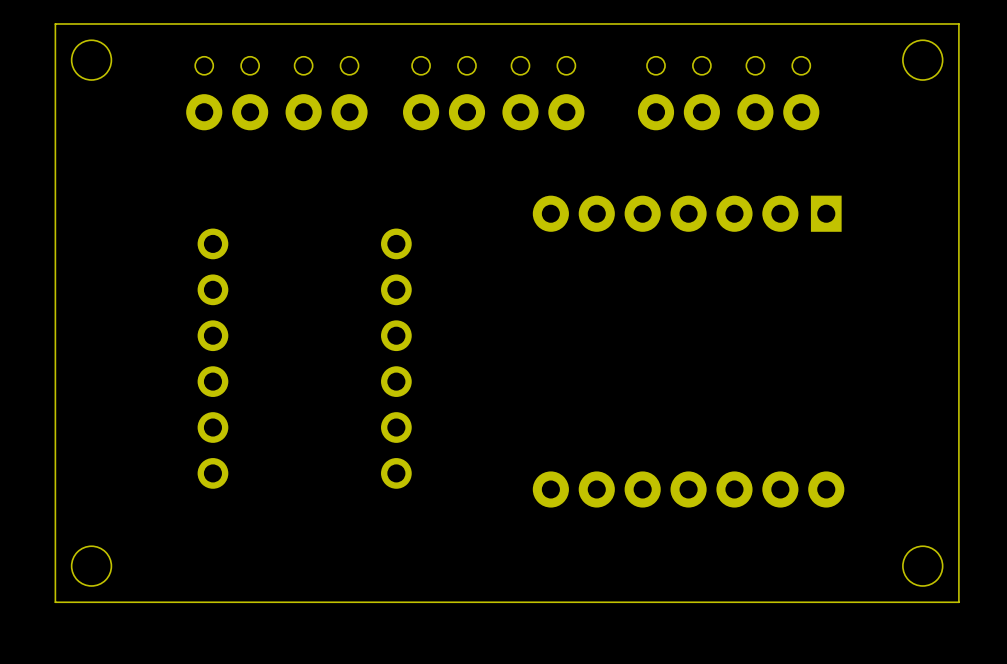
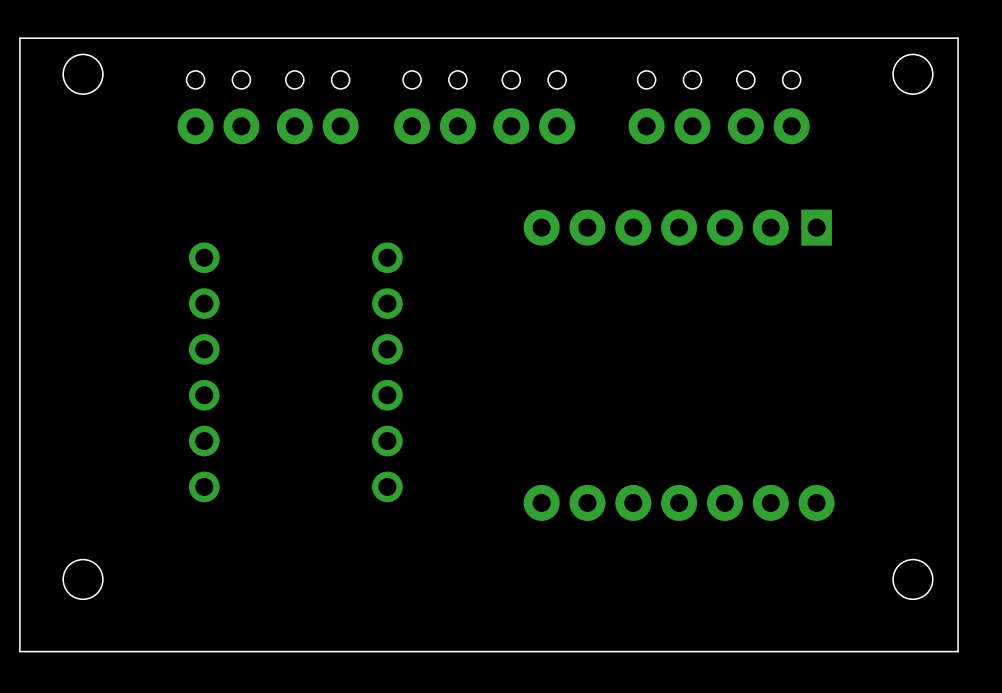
board edge: (958, 24) (958, 602) (55, 602) (55, 24) -> (949, 38) (958, 38) (958, 651) (19, 651) (19, 38) (46, 38)

